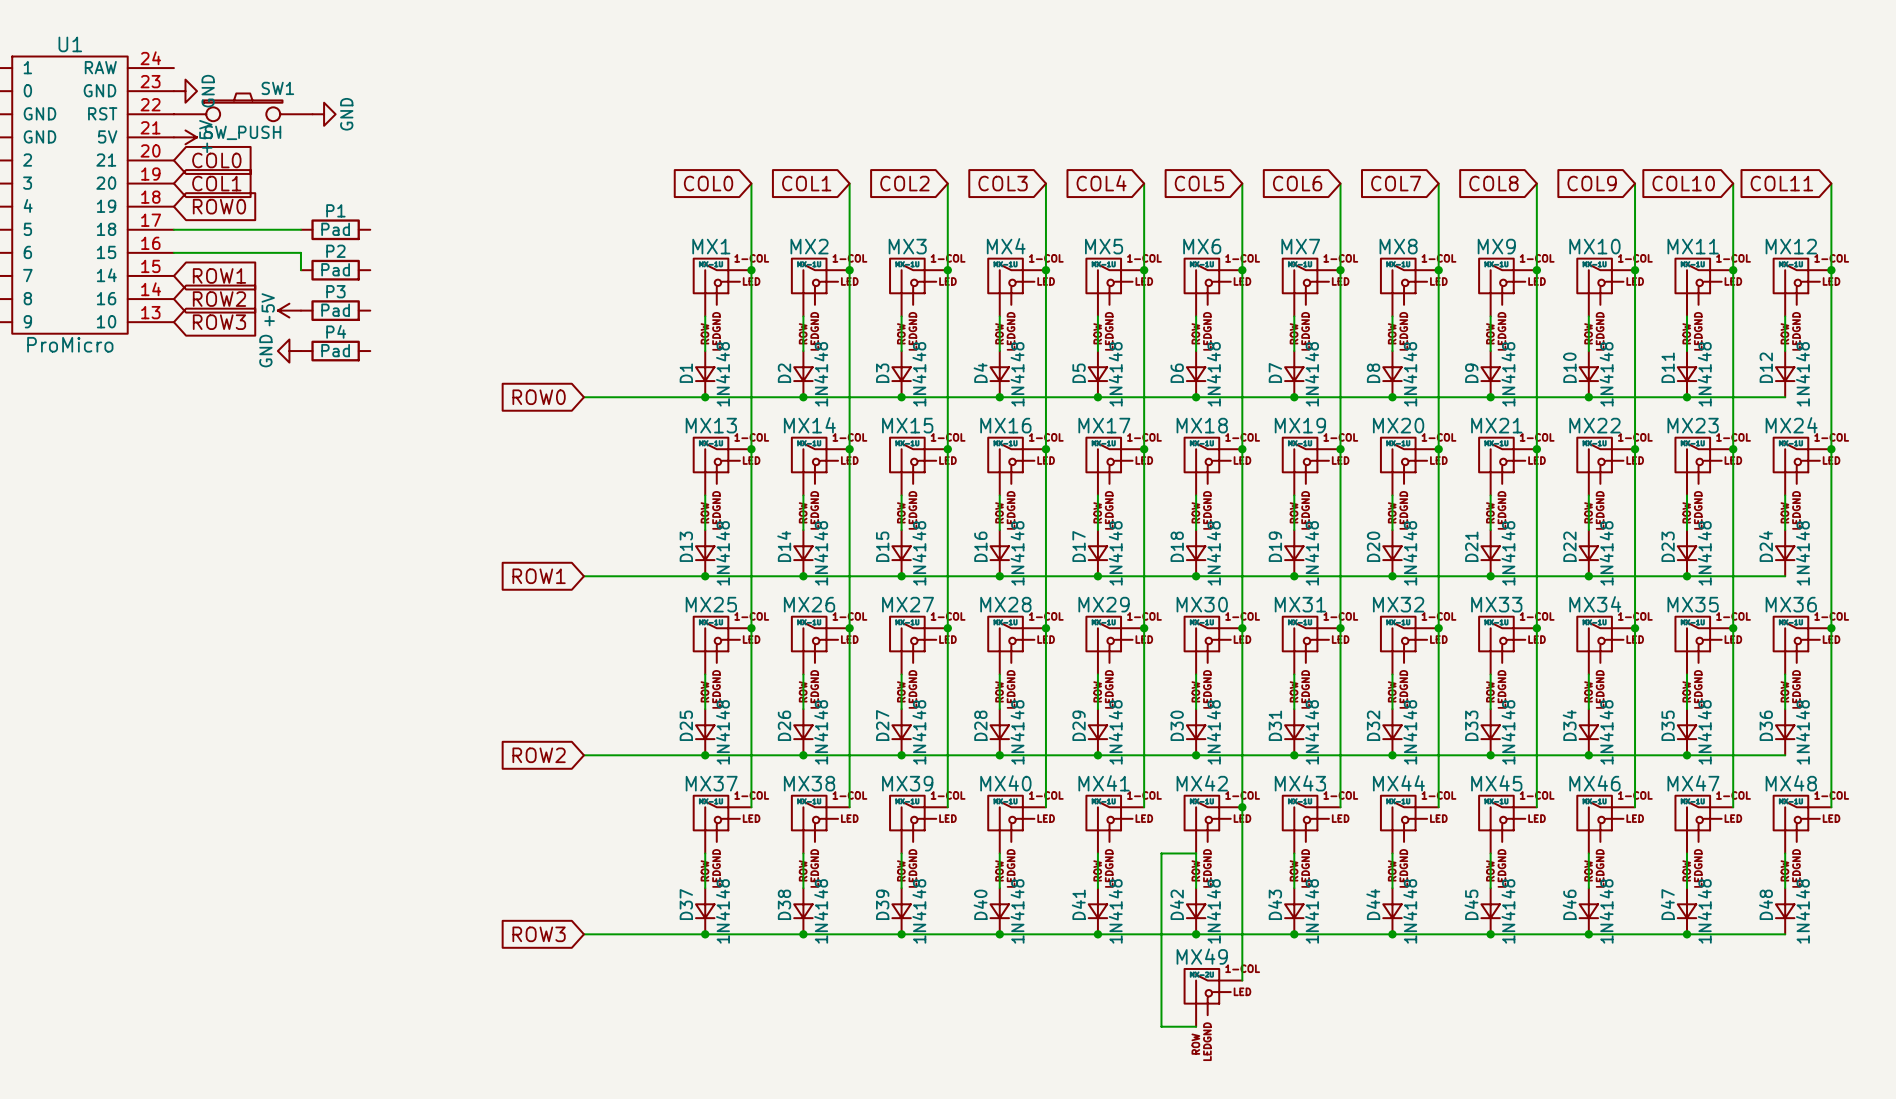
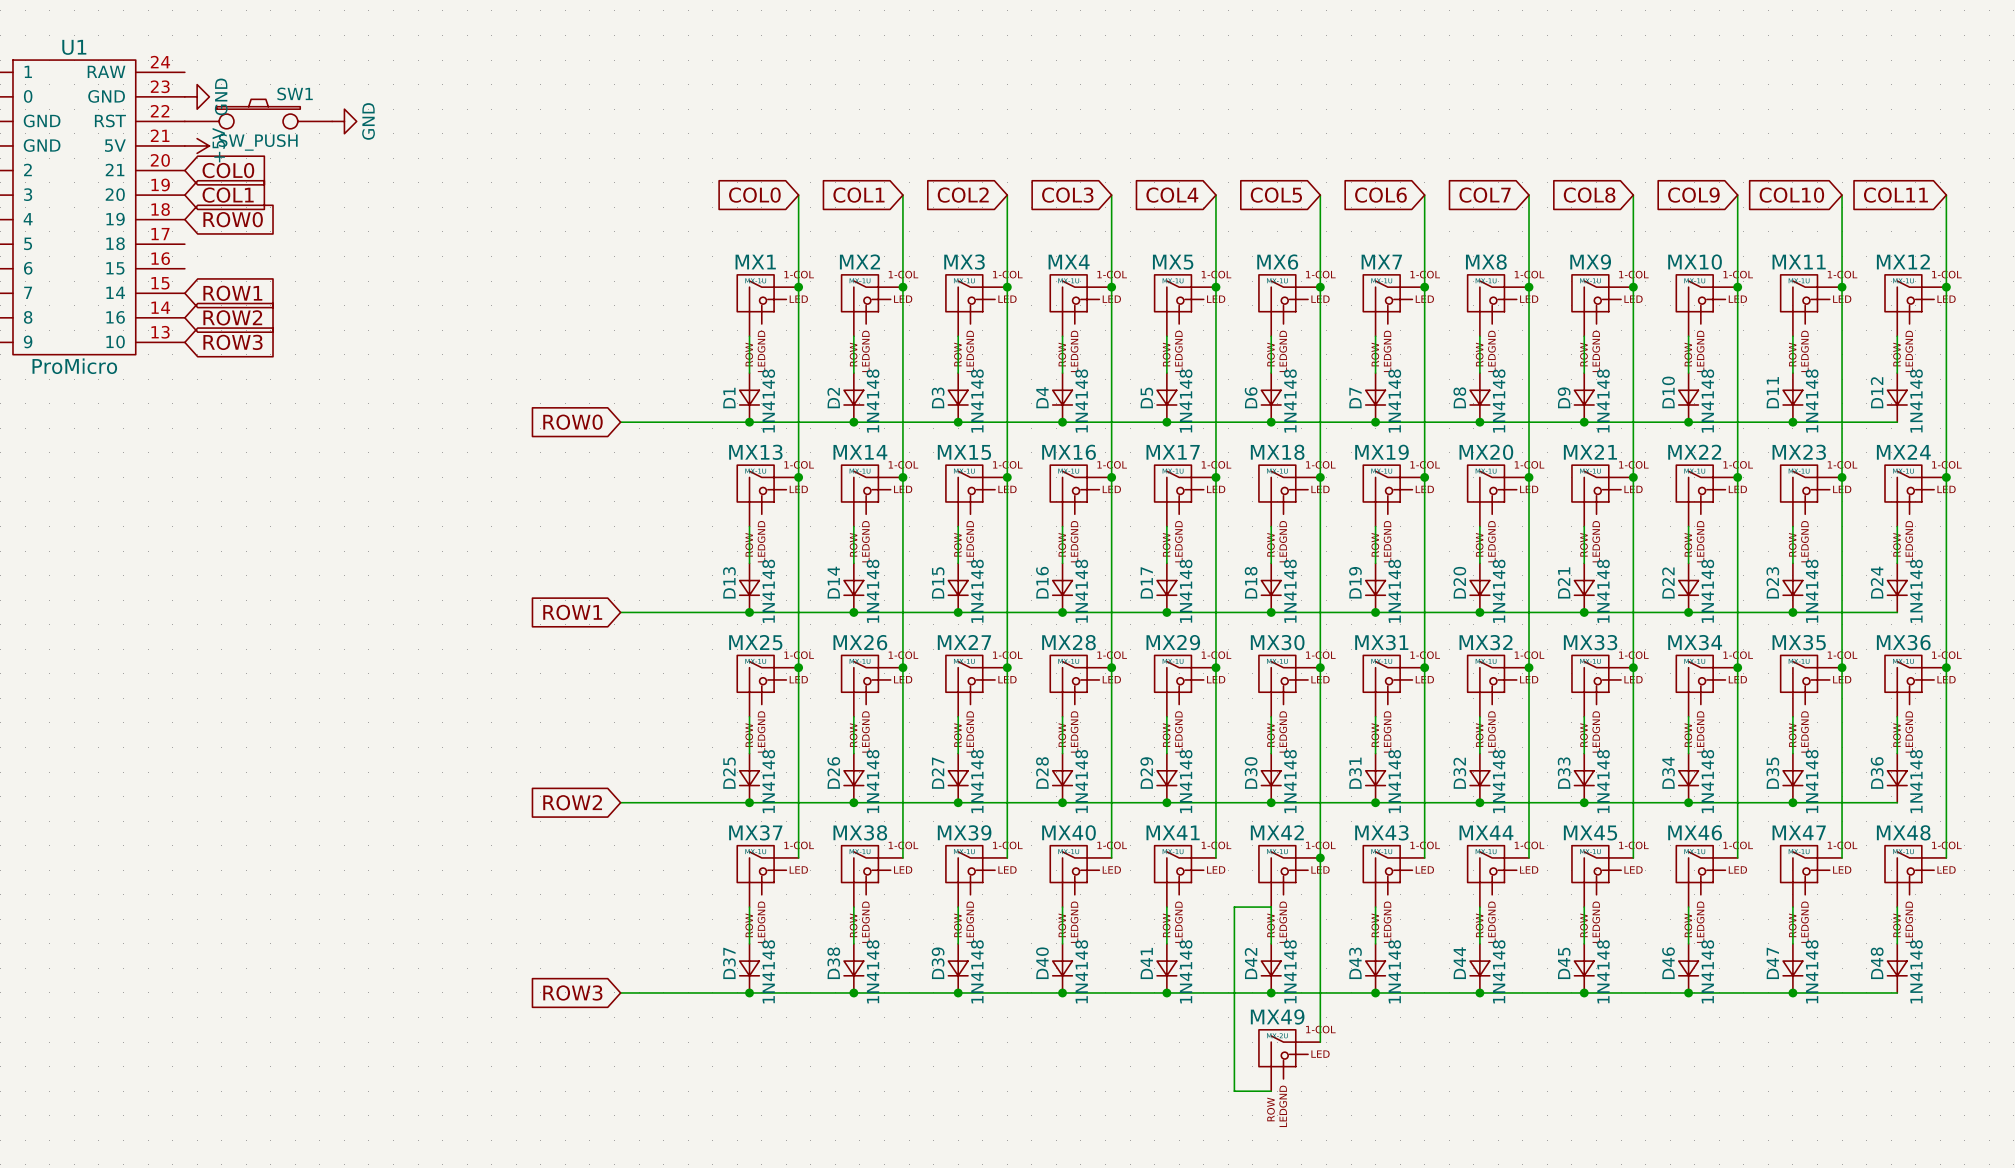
wire: (173, 229) (300, 229) -> none
P1: Pad (335, 229) -> none
wire: (173, 252) (300, 252) (300, 270) -> none
P2: Pad (335, 270) -> none
power symbol: +5V (289, 310) -> none
P3: Pad (335, 310) -> none
power symbol: GND (289, 351) -> none
P4: Pad (335, 351) -> none

